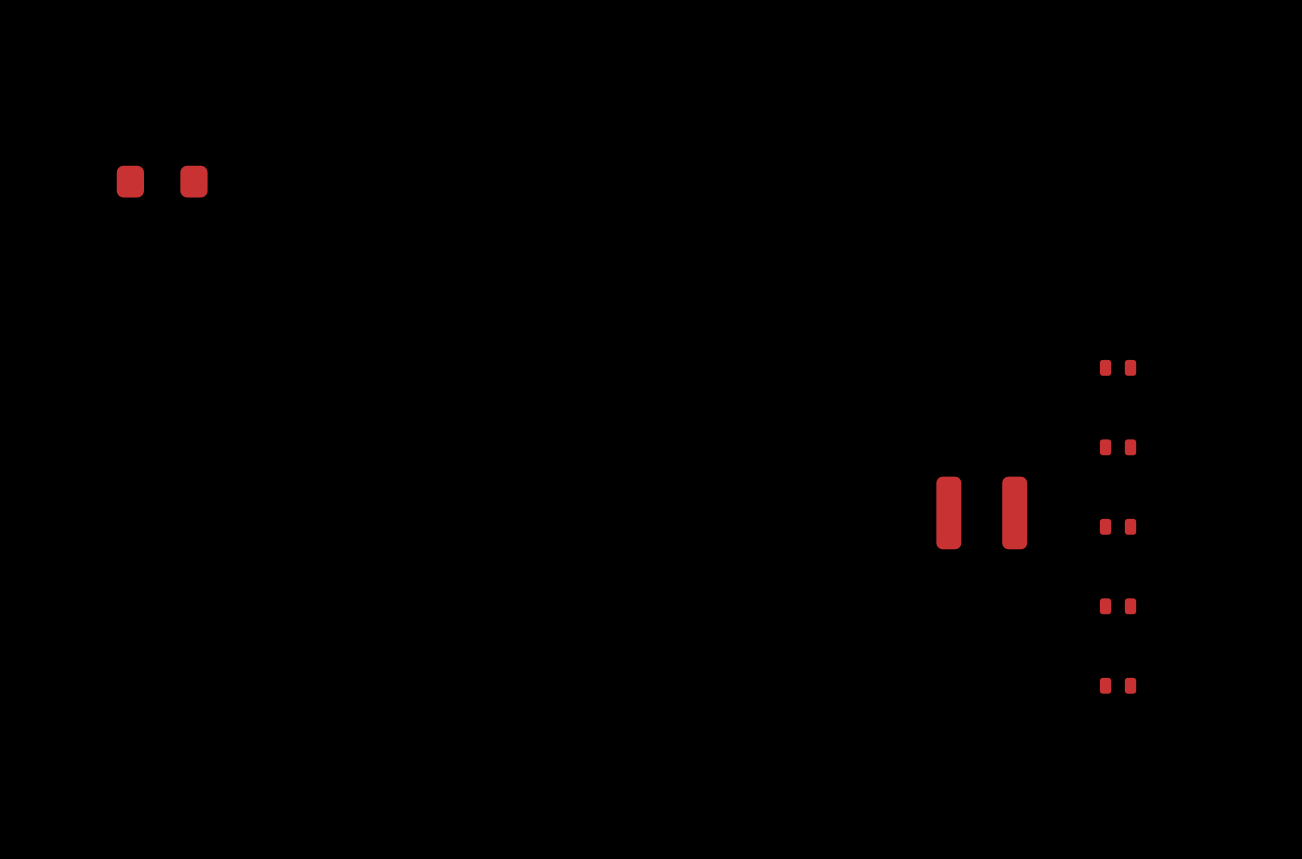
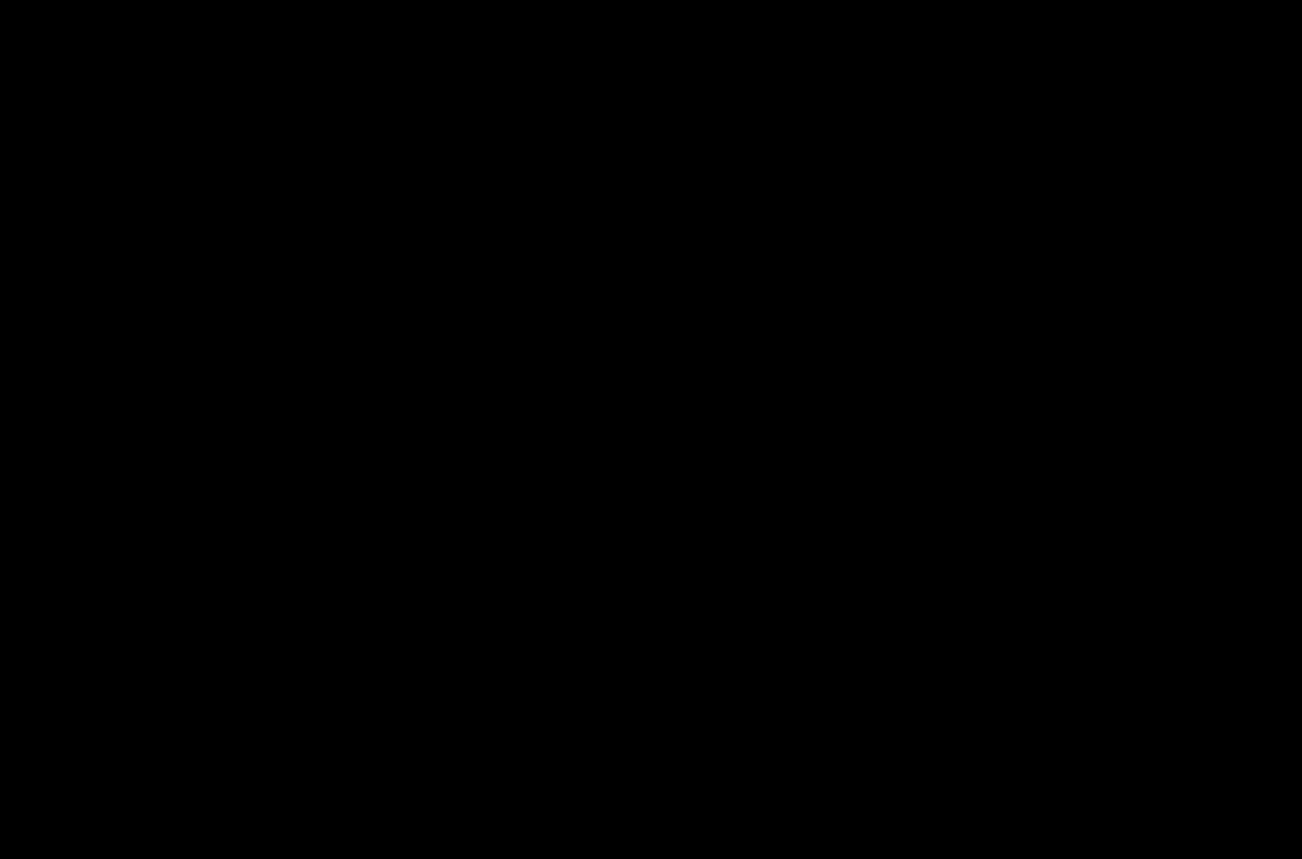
part: (162, 181) -> none
part: (1118, 367) -> none
part: (1118, 447) -> none
part: (981, 512) -> none
part: (1118, 526) -> none
part: (1118, 606) -> none
part: (1118, 685) -> none

